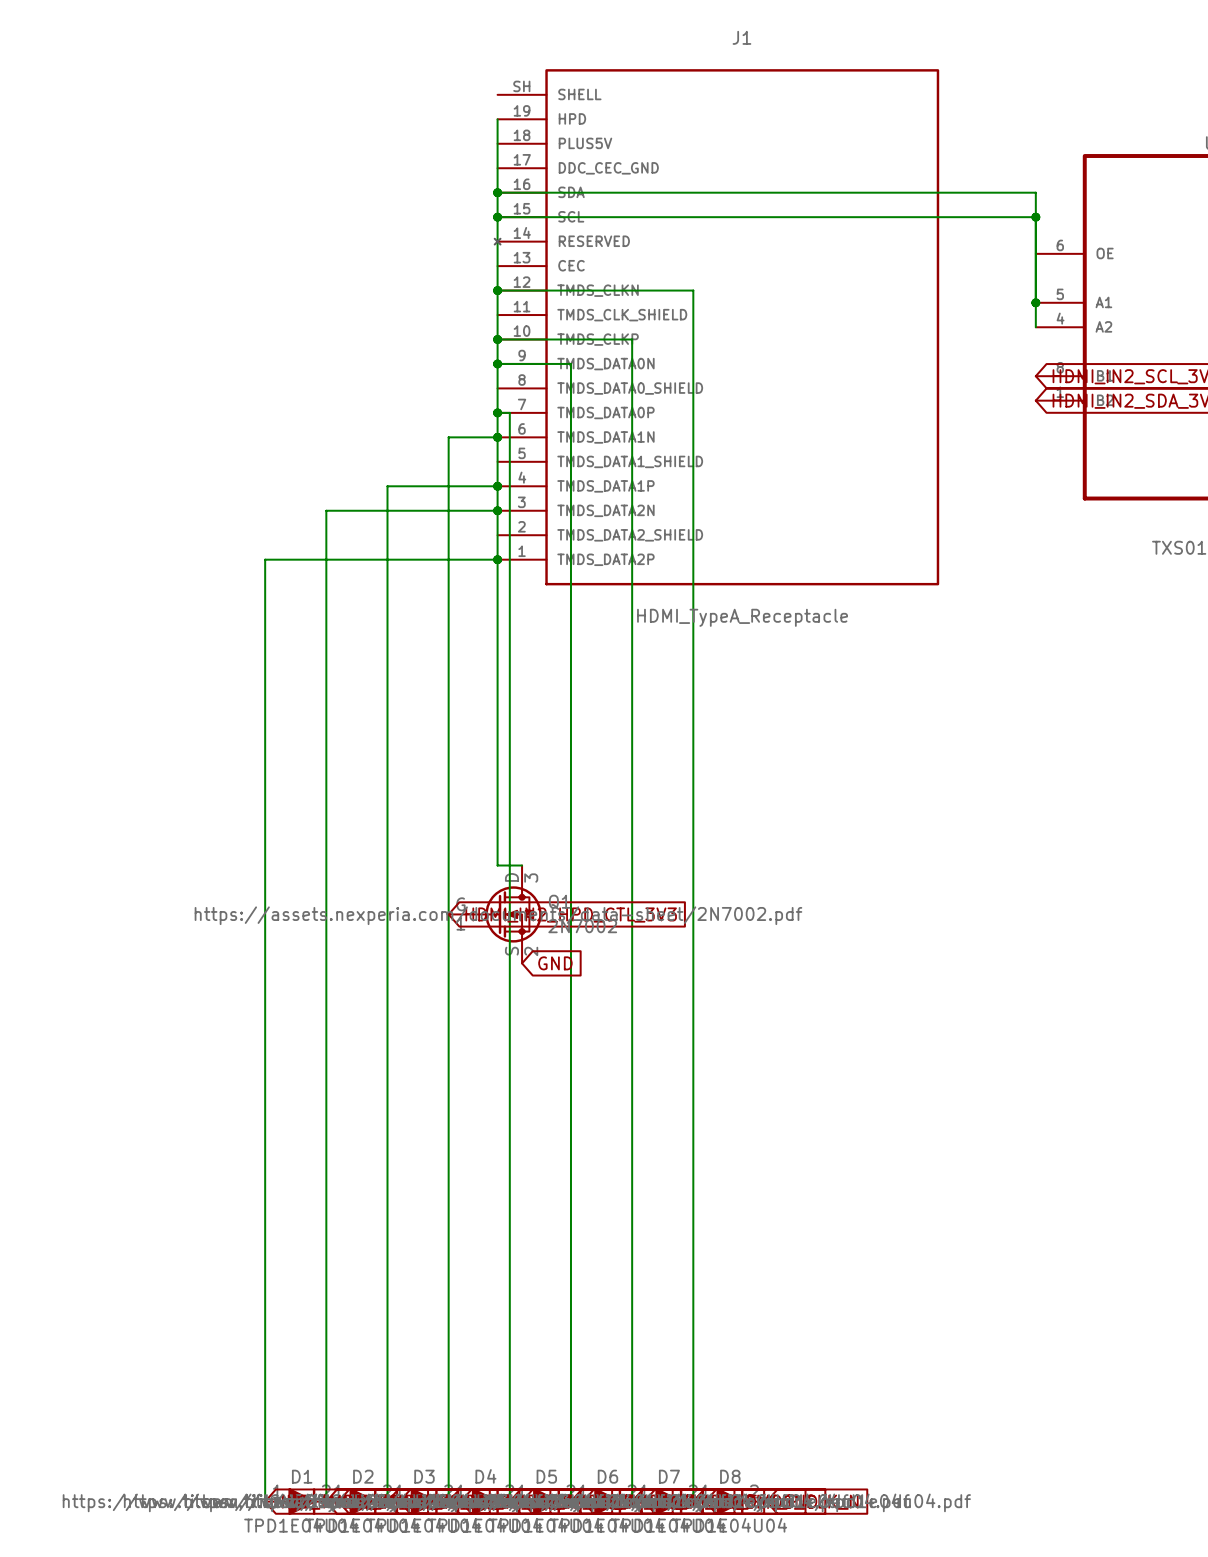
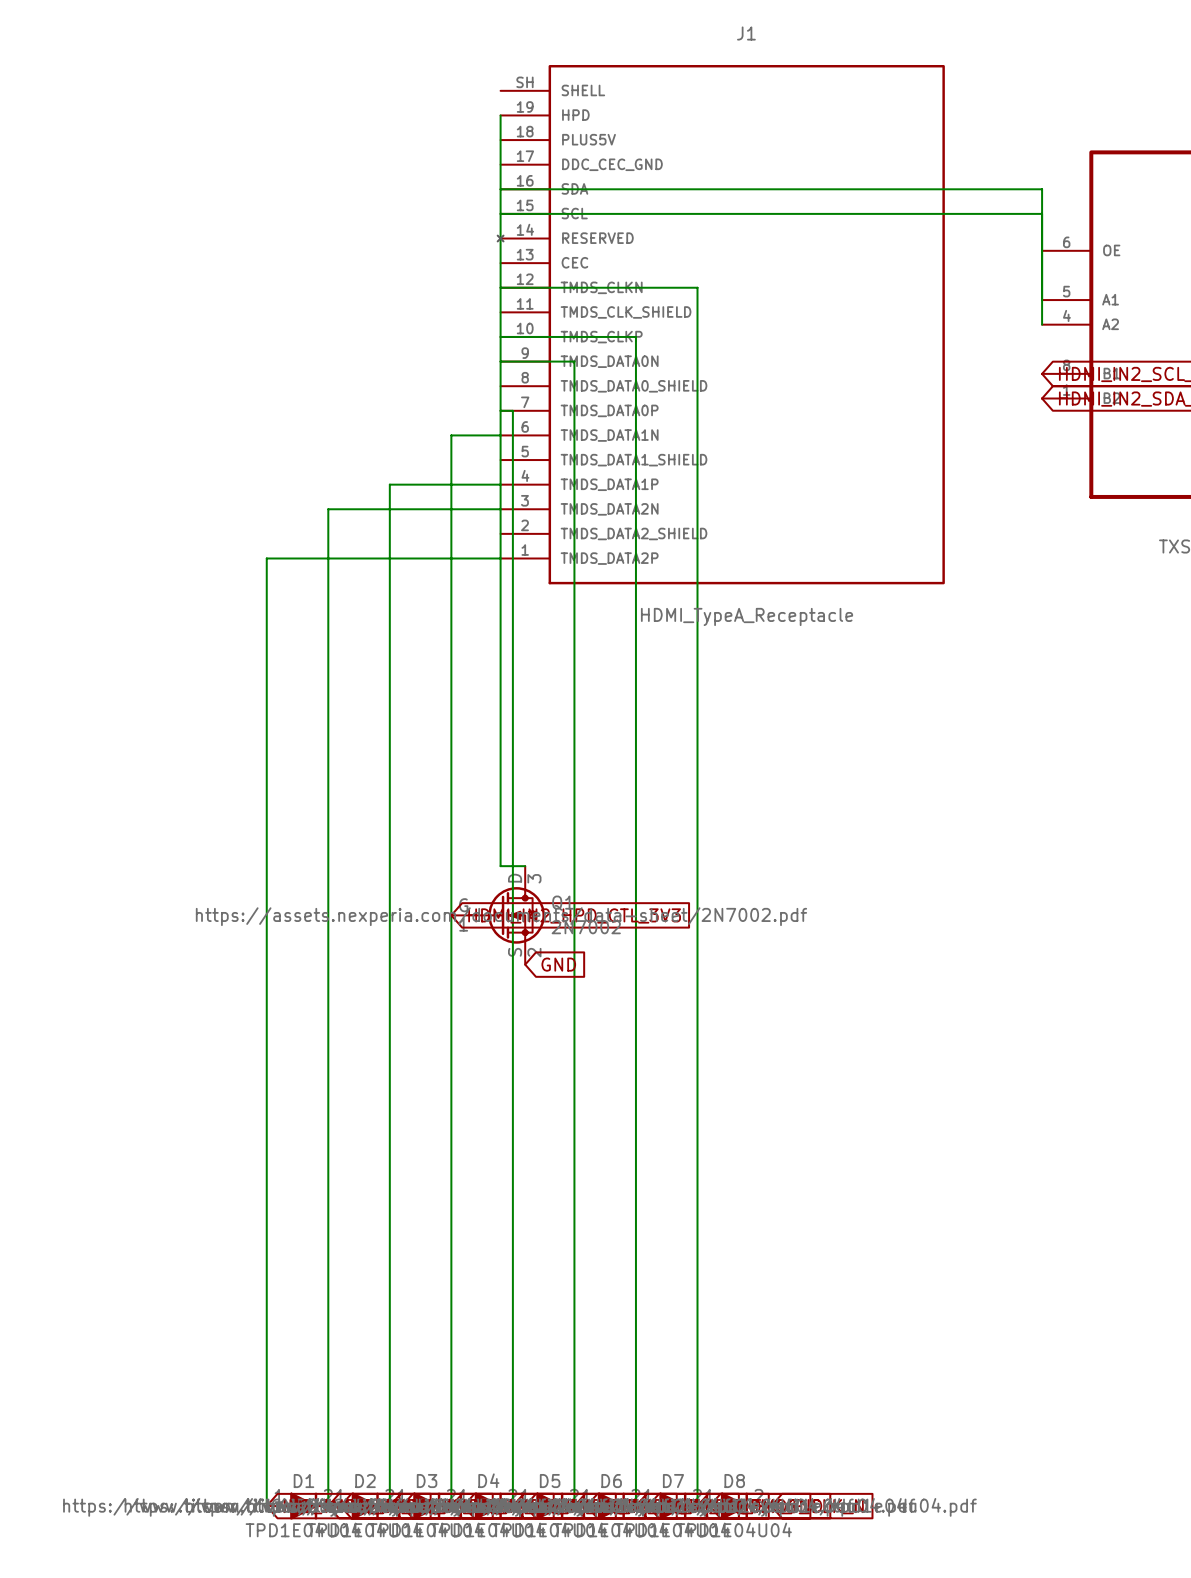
junction: (497, 192) -> none
junction: (497, 217) -> none
junction: (1035, 217) -> none
junction: (497, 290) -> none
junction: (1035, 302) -> none
junction: (497, 339) -> none
junction: (497, 363) -> none
junction: (497, 412) -> none
junction: (497, 437) -> none
junction: (497, 486) -> none
junction: (497, 510) -> none
junction: (497, 559) -> none

